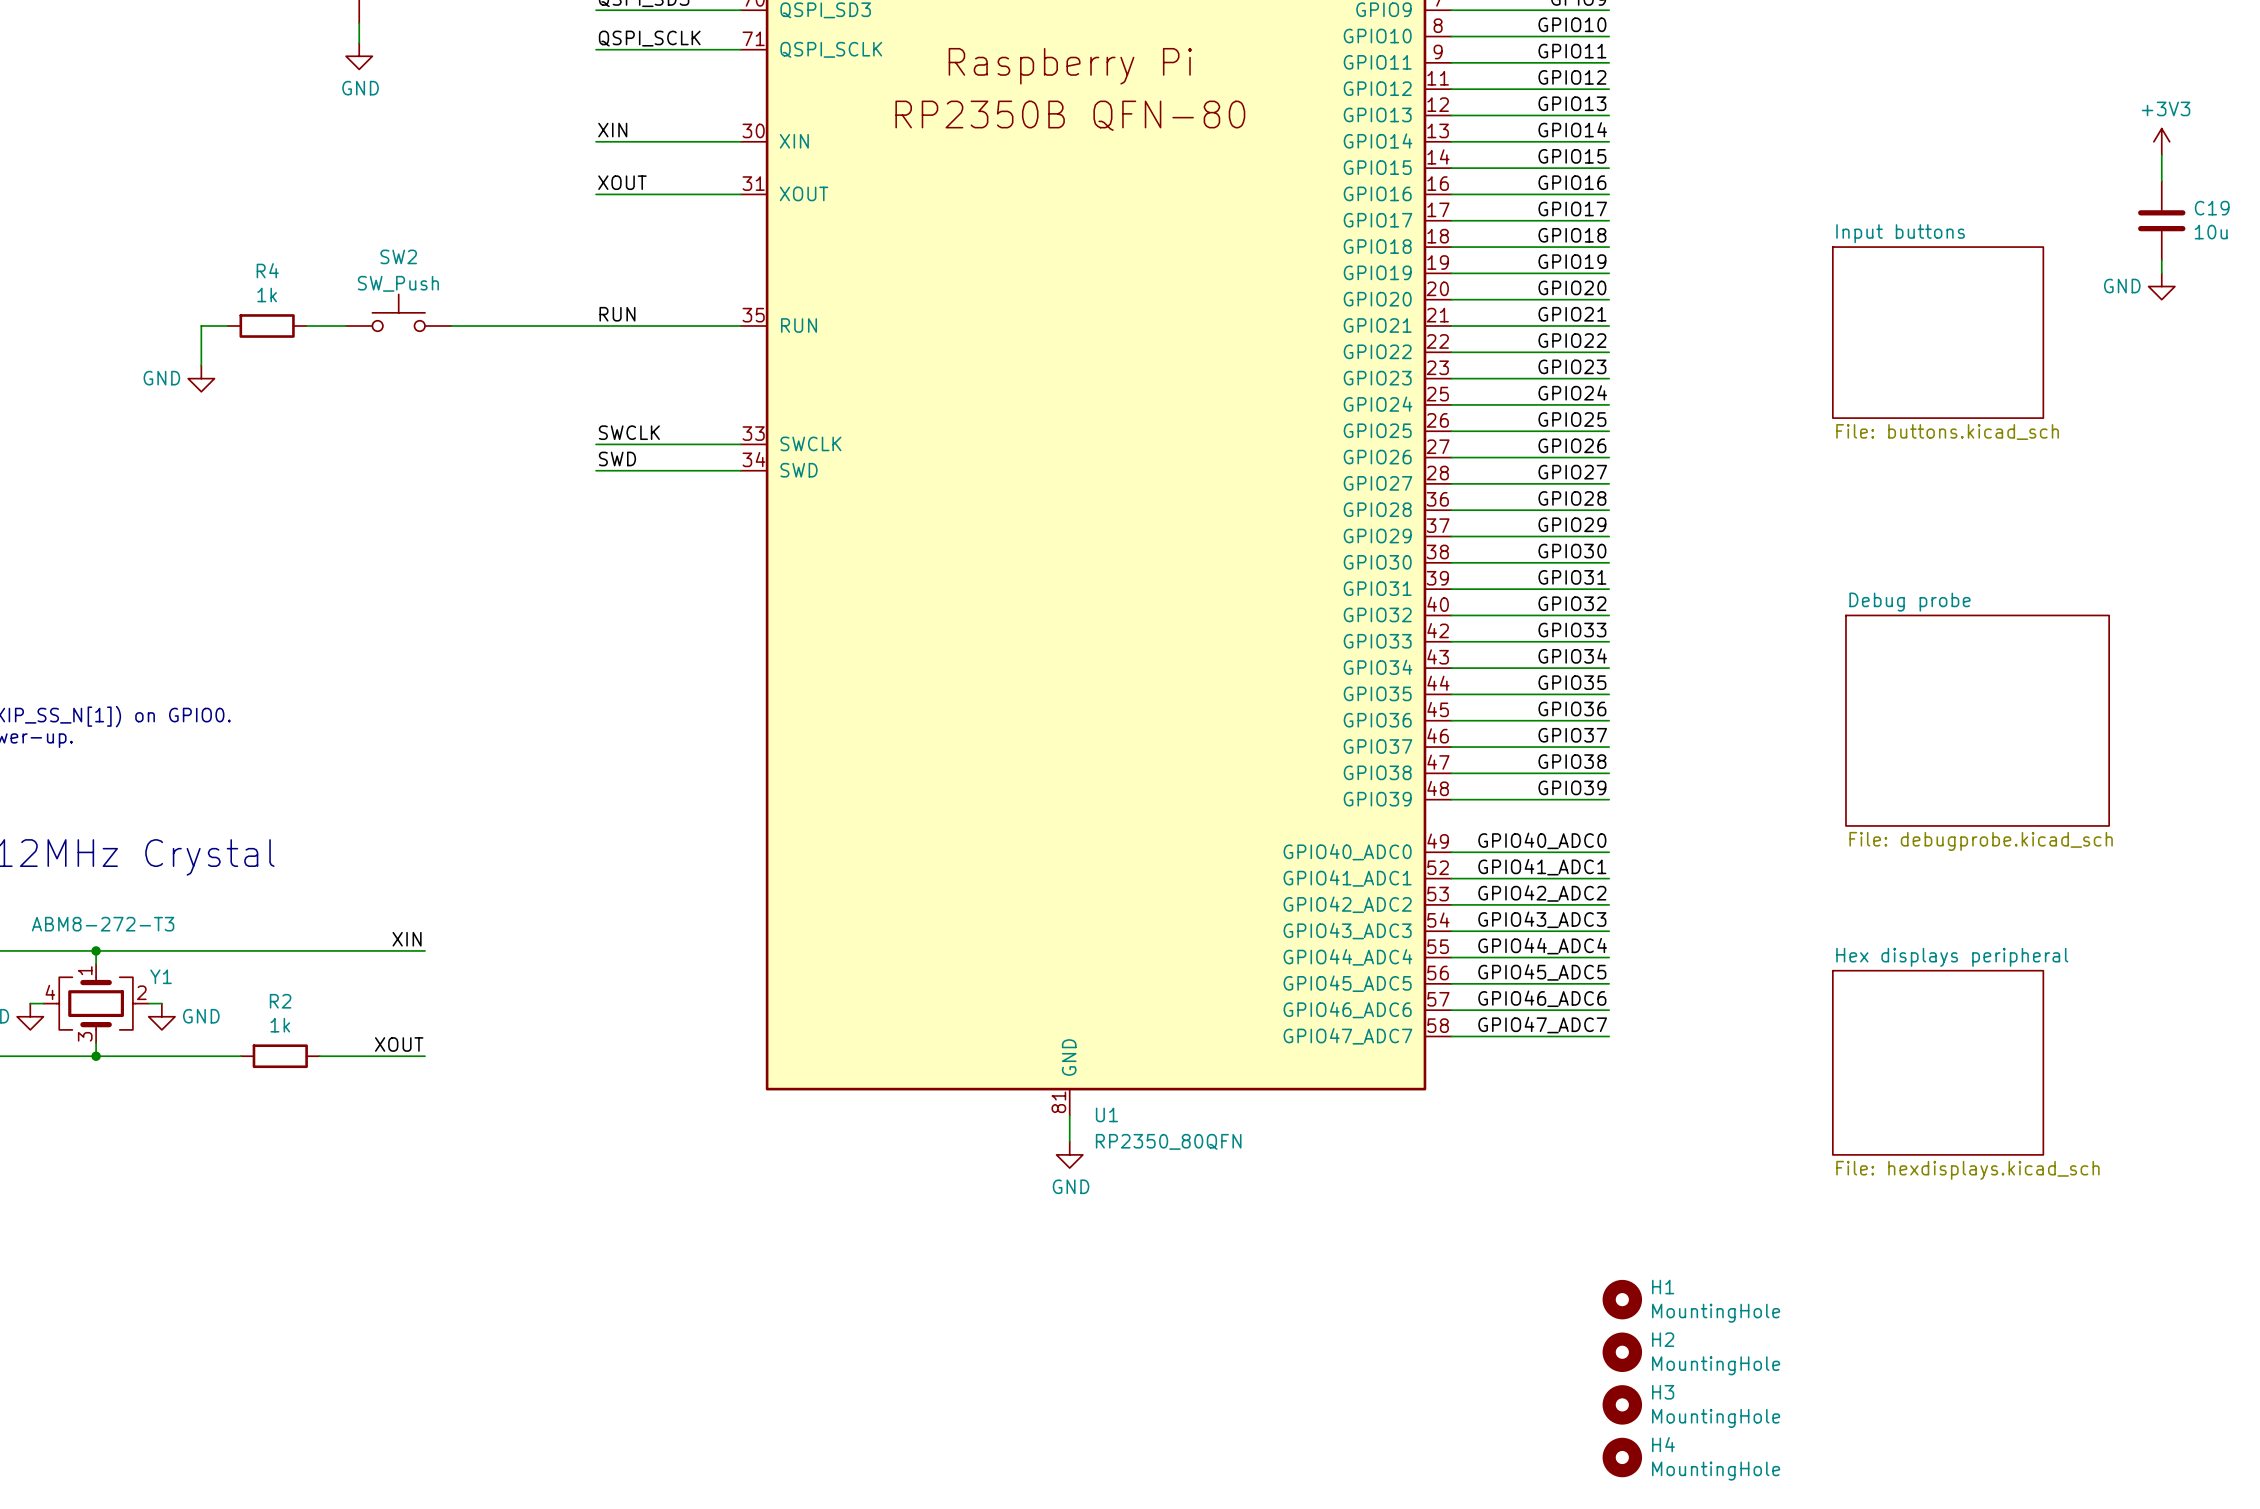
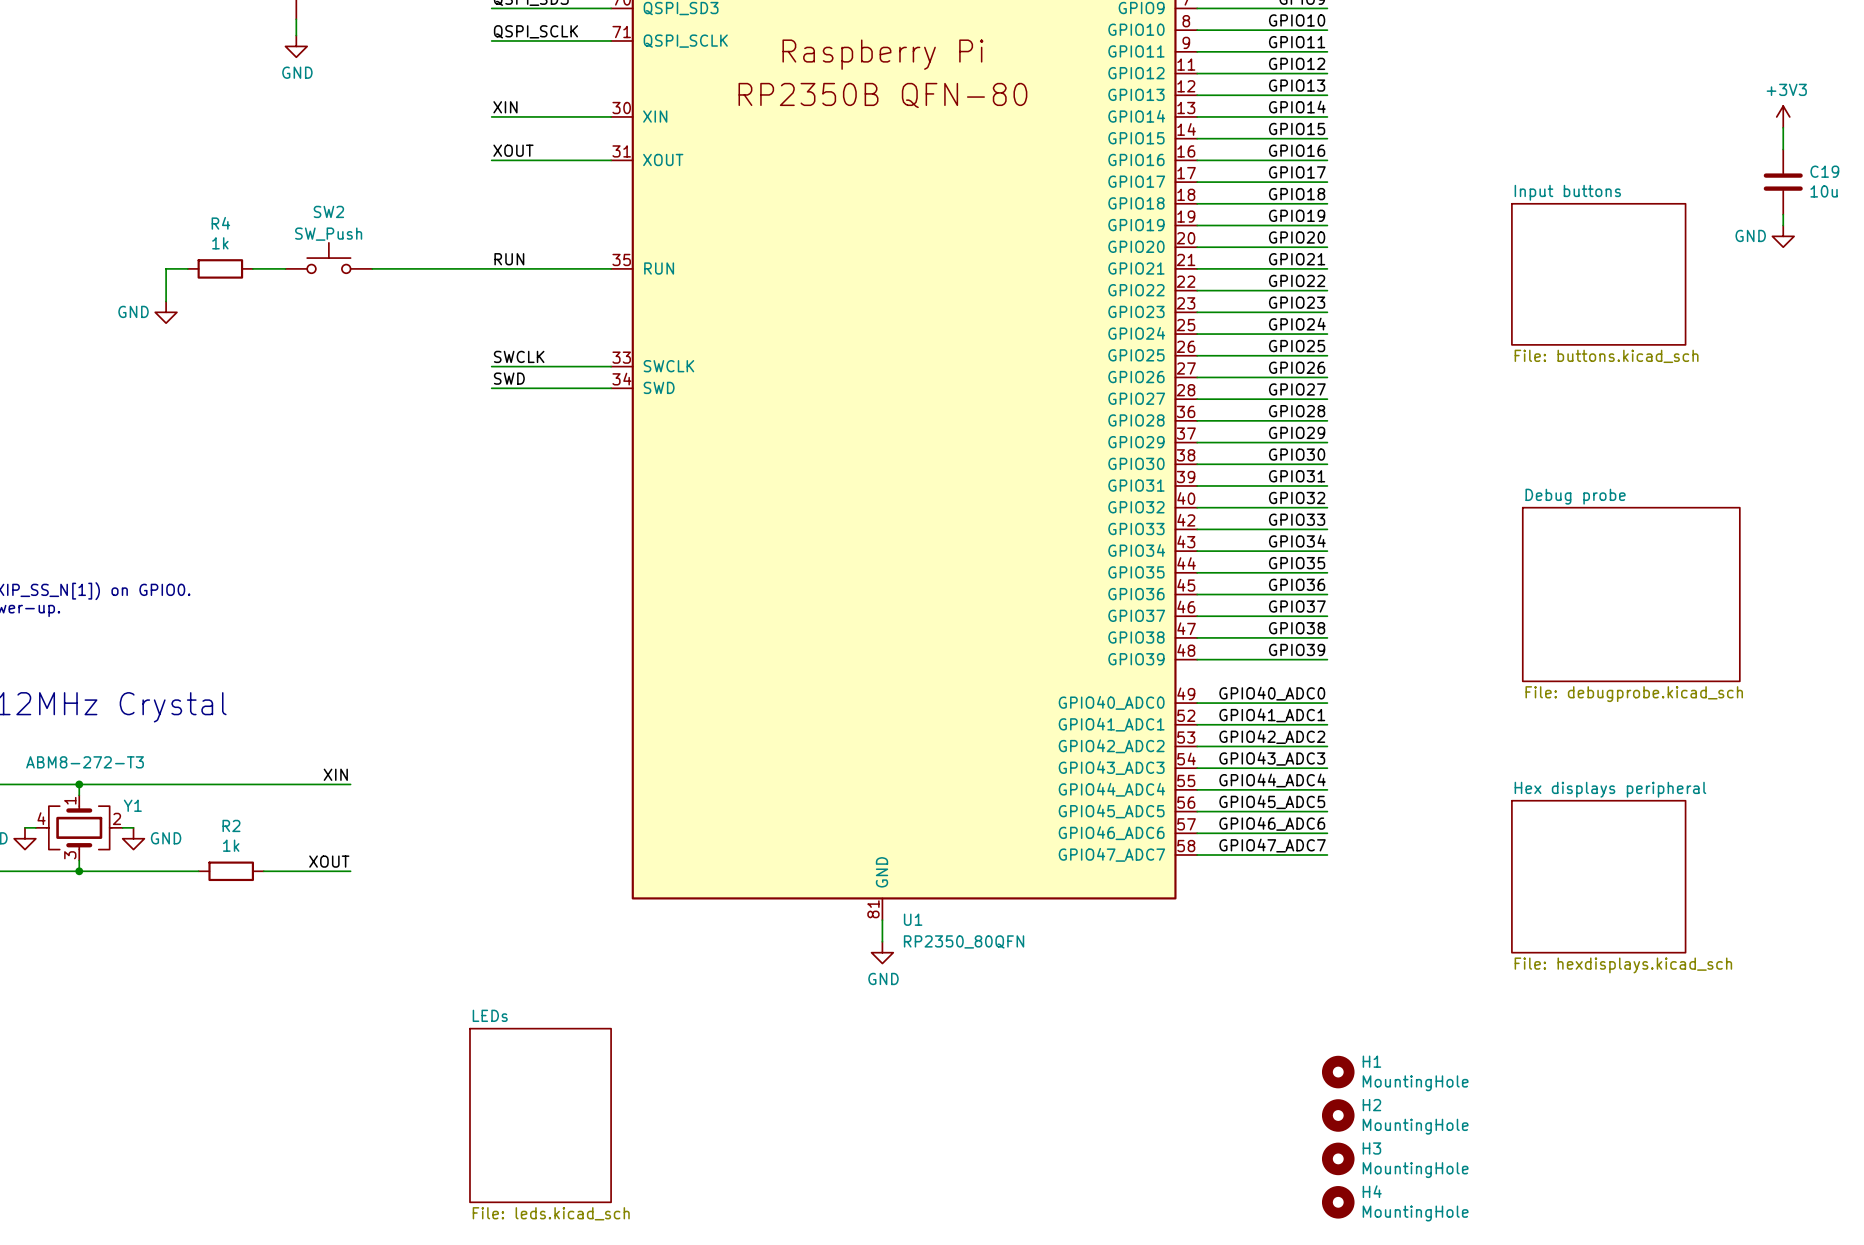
sheet LEDs: none -> File: leds.kicad_sch (540, 1115)

